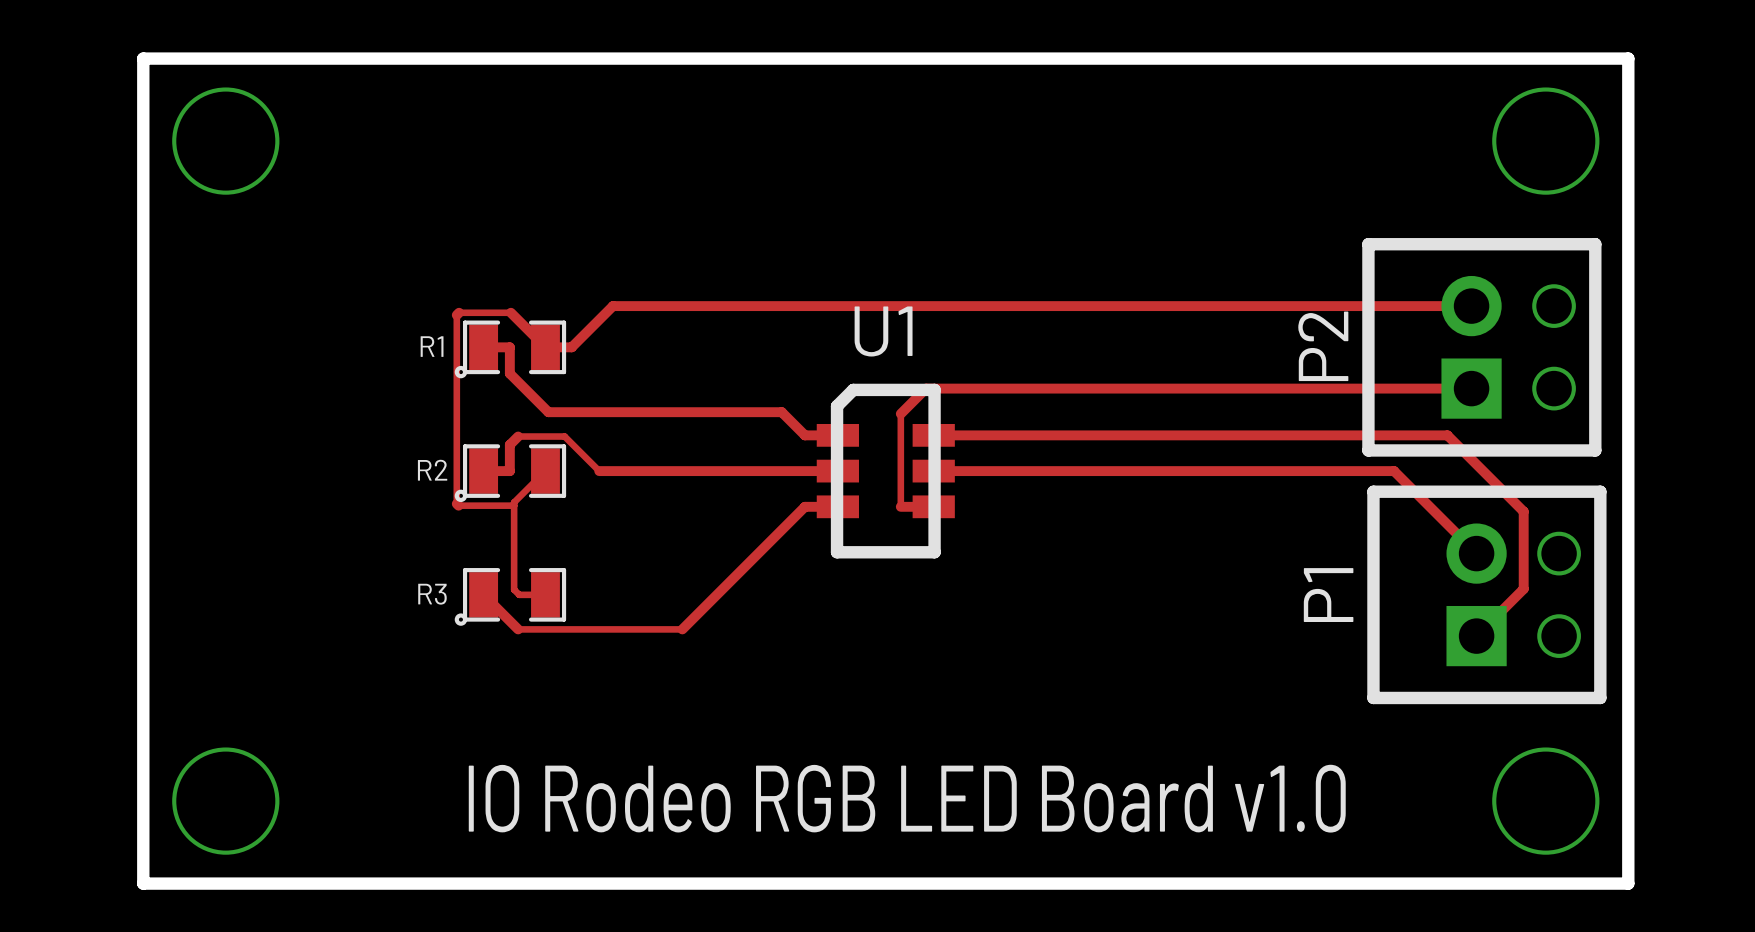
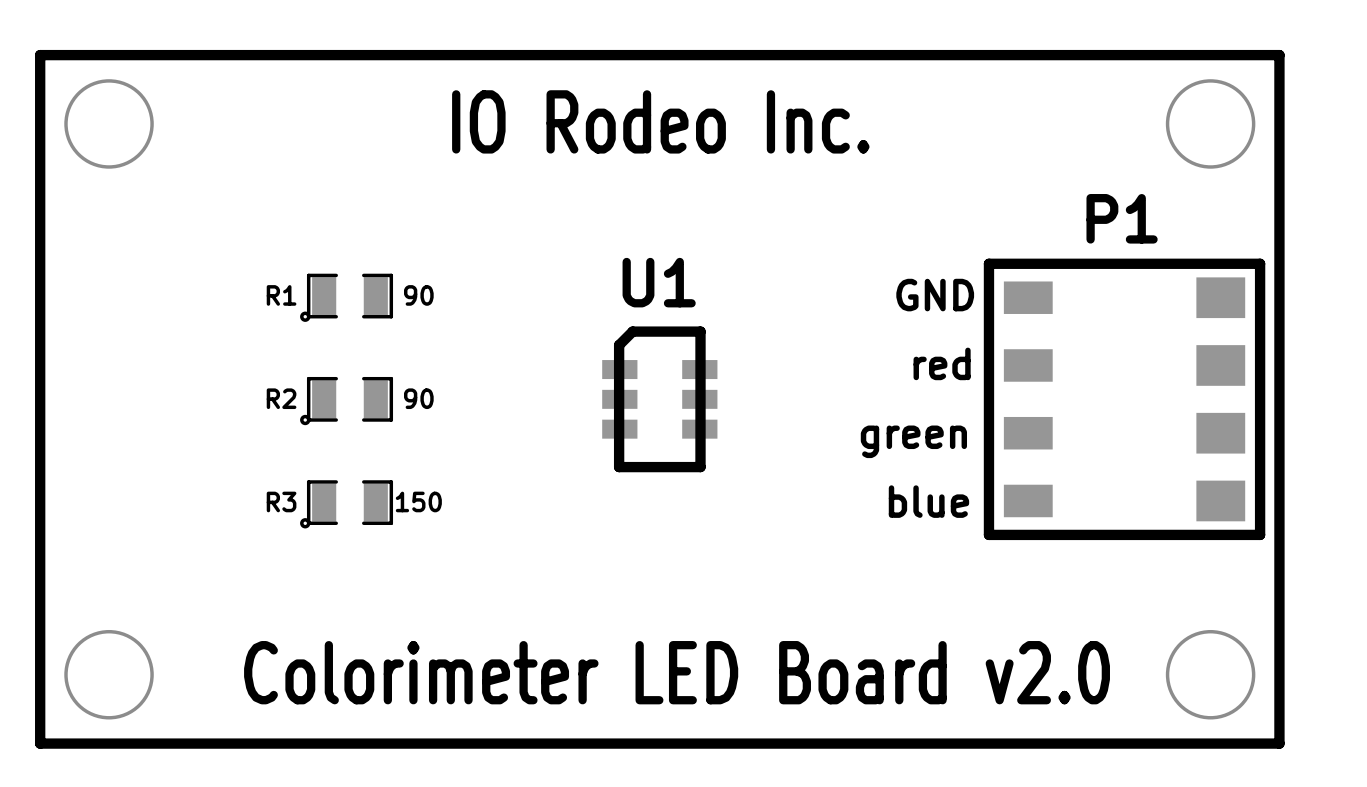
text: none -> IO Rodeo Inc. (660, 121)
track: (1471, 306) (612, 306) (571, 347) (545, 347) (510, 312) (459, 312) (456, 315) (456, 503) (458, 505) (514, 505) -> none
R1 value: none -> 90 (418, 295)
text: none -> GND (935, 295)
track: (483, 347) (509, 347) (509, 373) (548, 412) (781, 412) (804, 435) (837, 435) -> none
P2: (1481, 347) -> none
track: (1471, 388) (926, 388) (900, 413) (900, 506) (933, 506) -> none
text: none -> red (942, 363)
track: (933, 435) (1447, 435) (1523, 511) (1523, 588) (1476, 636) -> none
R2 value: none -> 90 (418, 398)
track: (483, 471) (509, 471) (509, 444) (518, 436) (564, 436) (599, 471) (837, 471) -> none
track: (545, 471) (514, 502) (514, 589) (519, 594) (545, 594) -> none
track: (933, 471) (1394, 471) (1476, 553) -> none
P1 footprint: [1367, 485, 1607, 705] -> [983, 258, 1266, 541]
track: (837, 506) (804, 506) (682, 629) (518, 629) (483, 594) -> none
text: none -> green (913, 441)
text: none -> blue (928, 501)
R3 value: none -> 150 (418, 501)
P1 name position: P1 (1328, 595) -> P1 (1122, 218)
text: IO Rodeo RGB LED Board v1.0 (907, 798) -> Colorimeter LED Board v2.0 (677, 672)

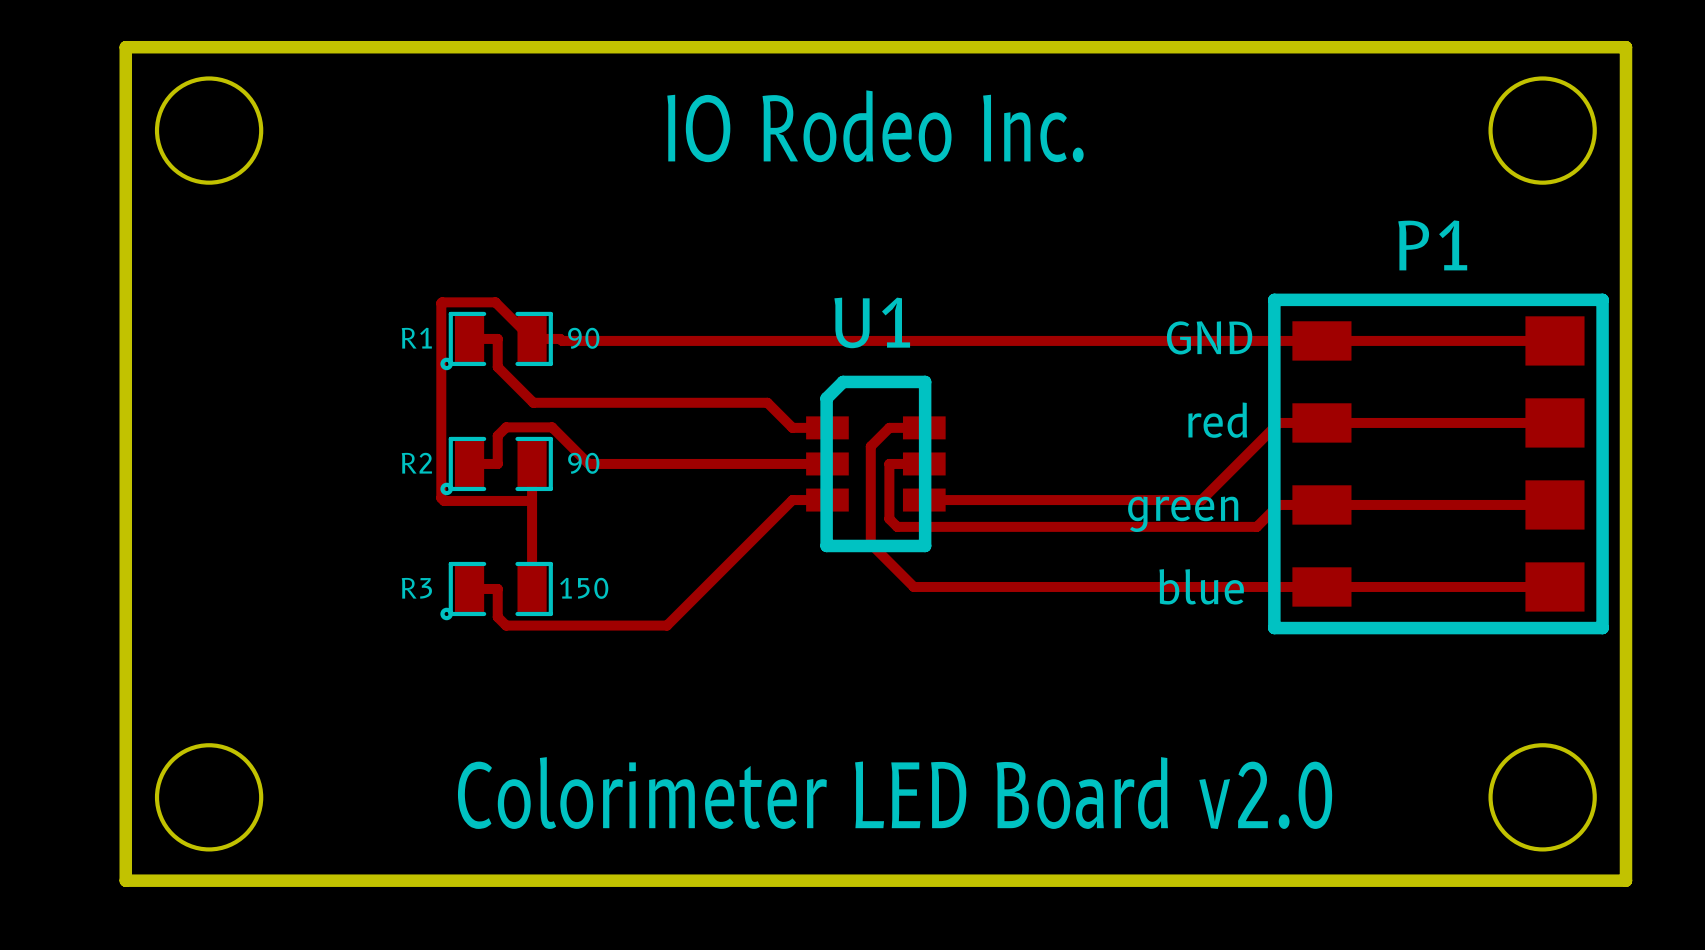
track: none -> (469, 338) (497, 338) (497, 367) (533, 402) (767, 402) (792, 427) (827, 427)
track: none -> (1554, 340) (562, 340) (560, 338) (532, 338) (495, 302) (442, 302) (441, 498) (444, 500) (532, 500)
track: none -> (1554, 422) (1278, 422) (1201, 500) (924, 500)
track: none -> (924, 427) (889, 427) (870, 446) (870, 543) (913, 586) (1554, 586)
track: none -> (469, 463) (497, 463) (497, 435) (506, 427) (552, 427) (588, 463) (827, 463)
track: none -> (532, 463) (532, 588)
track: none -> (924, 463) (889, 463) (889, 518) (897, 526) (1256, 526) (1278, 504) (1554, 504)
track: none -> (827, 500) (792, 500) (667, 625) (506, 625) (497, 617) (497, 588) (469, 588)

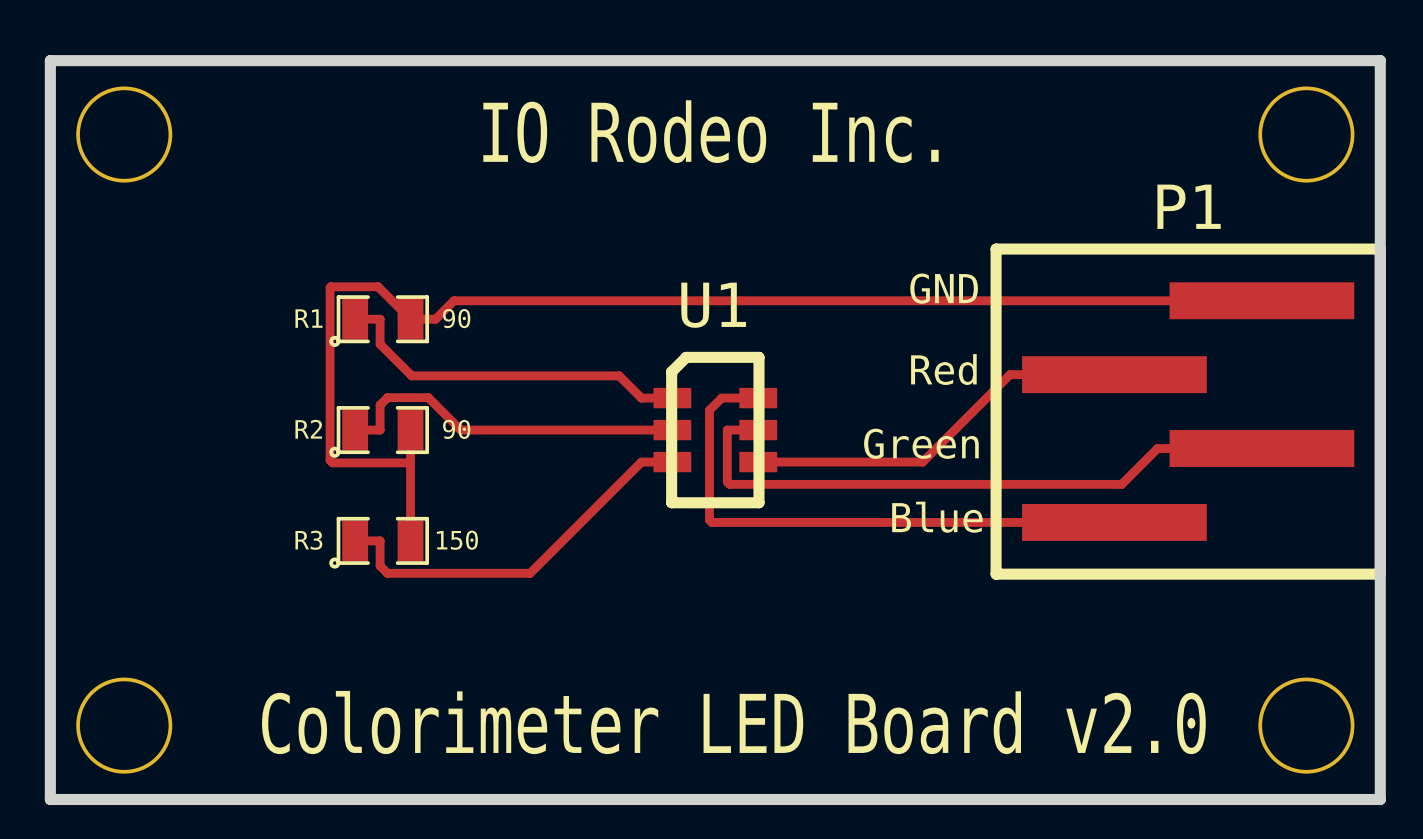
P1 footprint: [1268, 293, 1609, 635] -> [990, 243, 1386, 580]
text position: GND (1209, 337) -> GND (944, 288)
track: (560, 338) (562, 340) (1554, 340) -> (435, 319) (453, 300) (1261, 300)
text: red (1217, 420) -> Red (943, 369)
track: (1554, 422) (1278, 422) (1201, 500) (1109, 500) -> (1114, 374) (1010, 374) (922, 462)
track: (889, 427) (870, 446) (870, 543) (913, 586) (1554, 586) -> (727, 398) (721, 398) (709, 410) (709, 519) (711, 522) (1114, 522)
track: (1554, 504) (1278, 504) (1256, 526) (897, 526) (889, 518) -> (1261, 448) (1157, 448) (1121, 484) (729, 484) (727, 478)
text: green (1183, 514) -> Green (921, 443)
text: blue (1201, 586) -> Blue (937, 517)

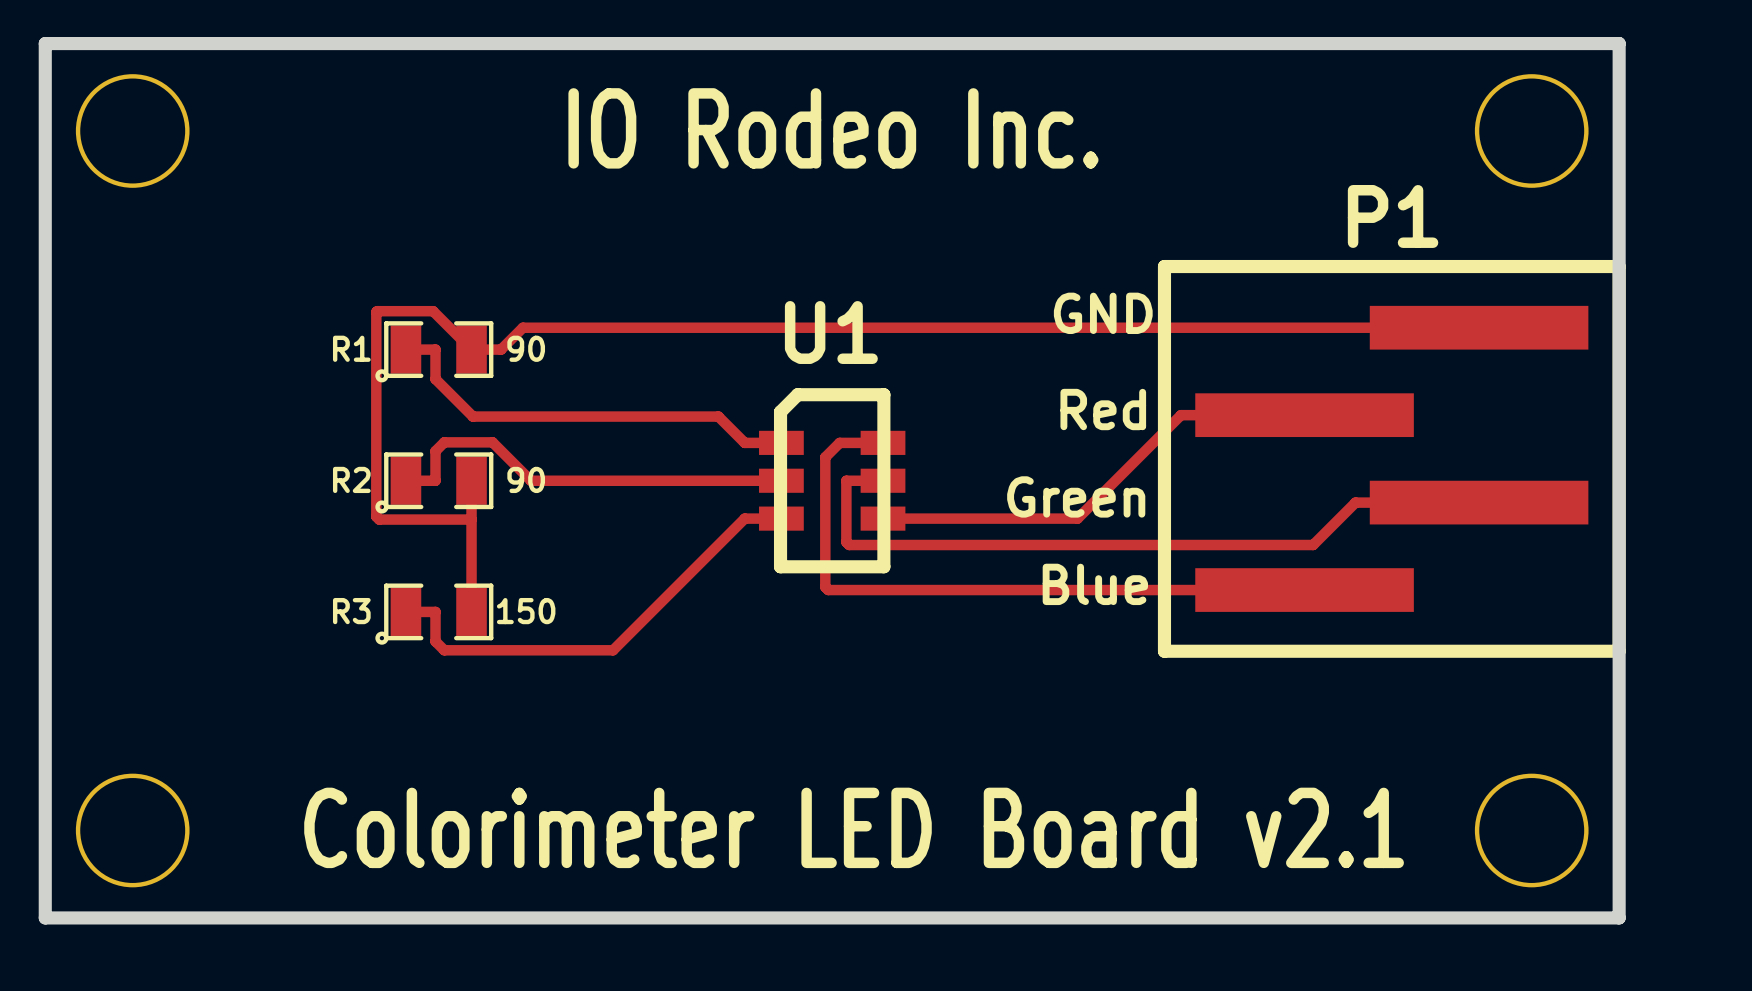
text: Colorimeter LED Board v2.0 (733, 722) -> Colorimeter LED Board v2.1 (854, 827)

